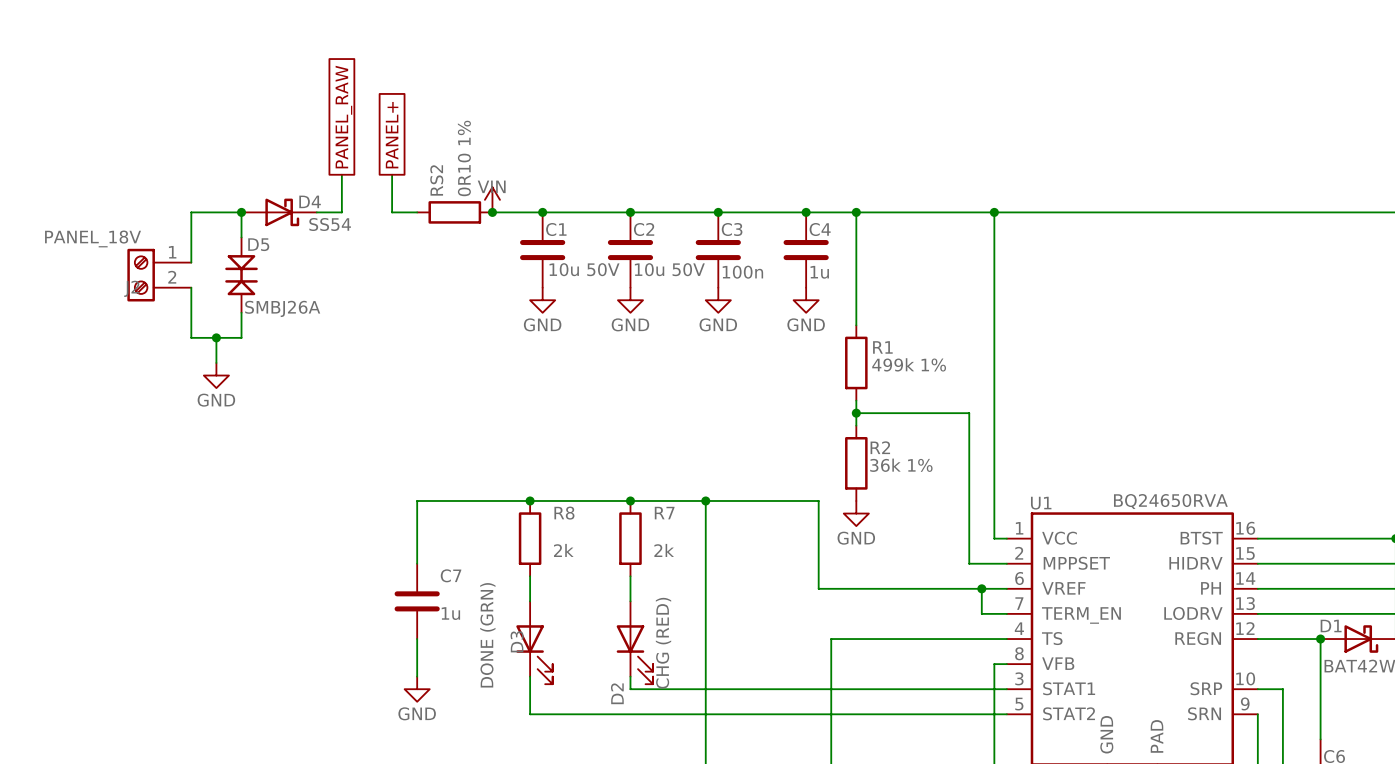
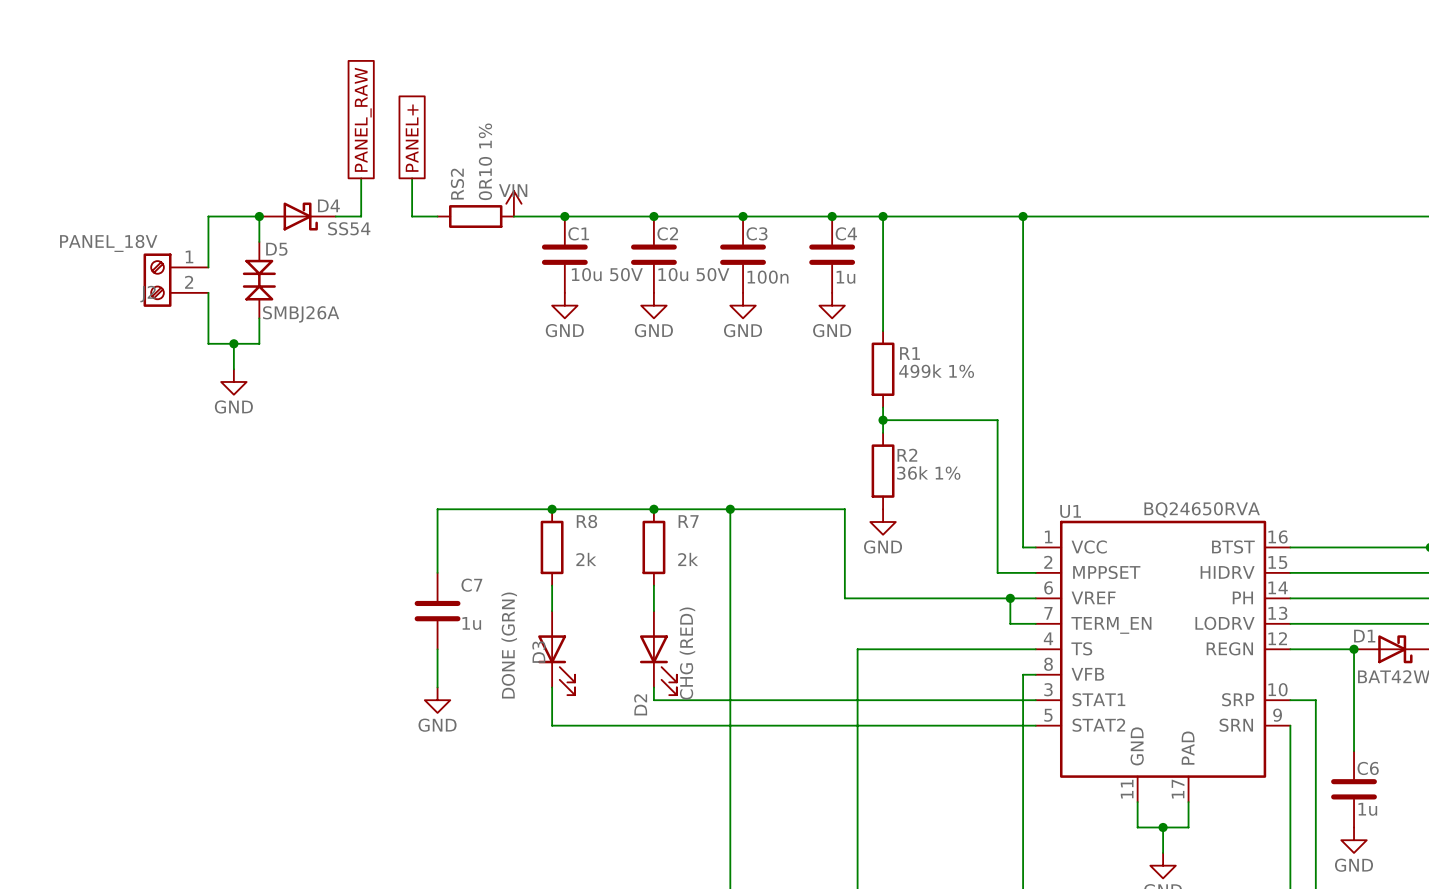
junction: (492, 212) -> none

